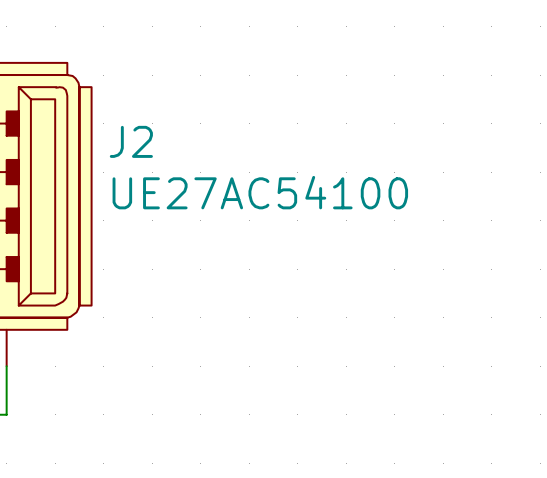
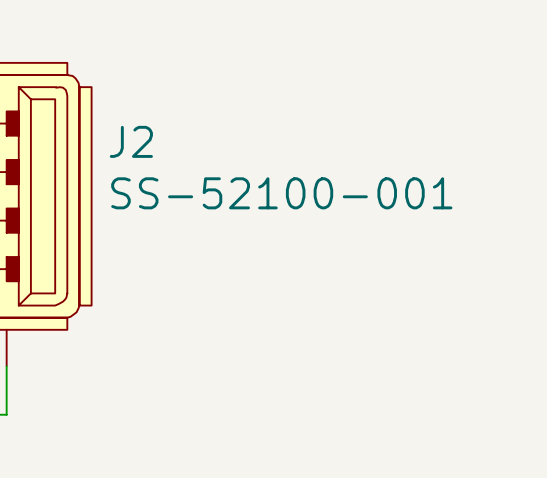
J2 value: UE27AC54100 (260, 192) -> SS-52100-001 (281, 193)

